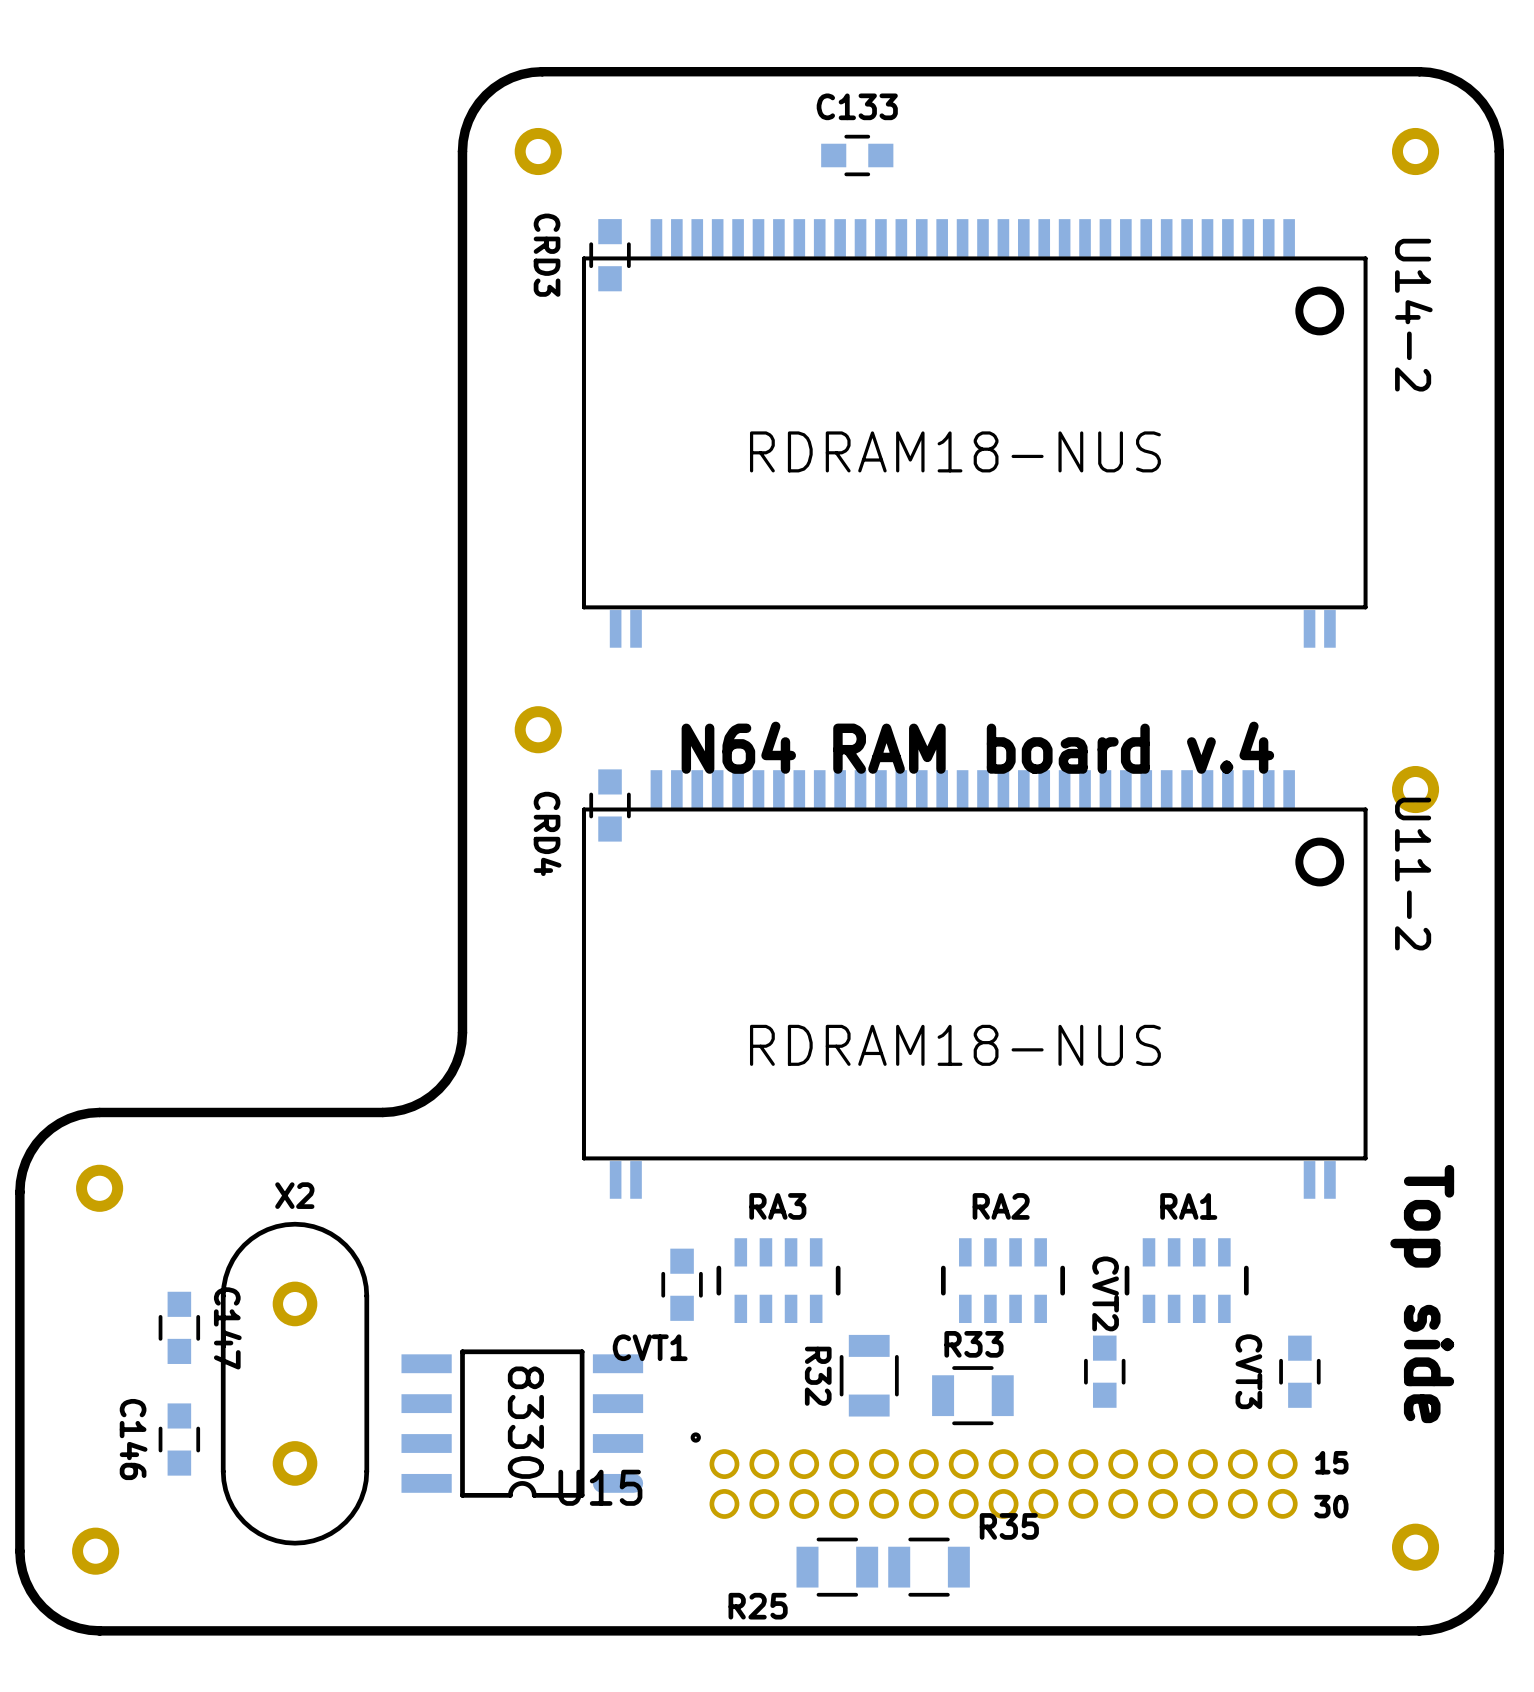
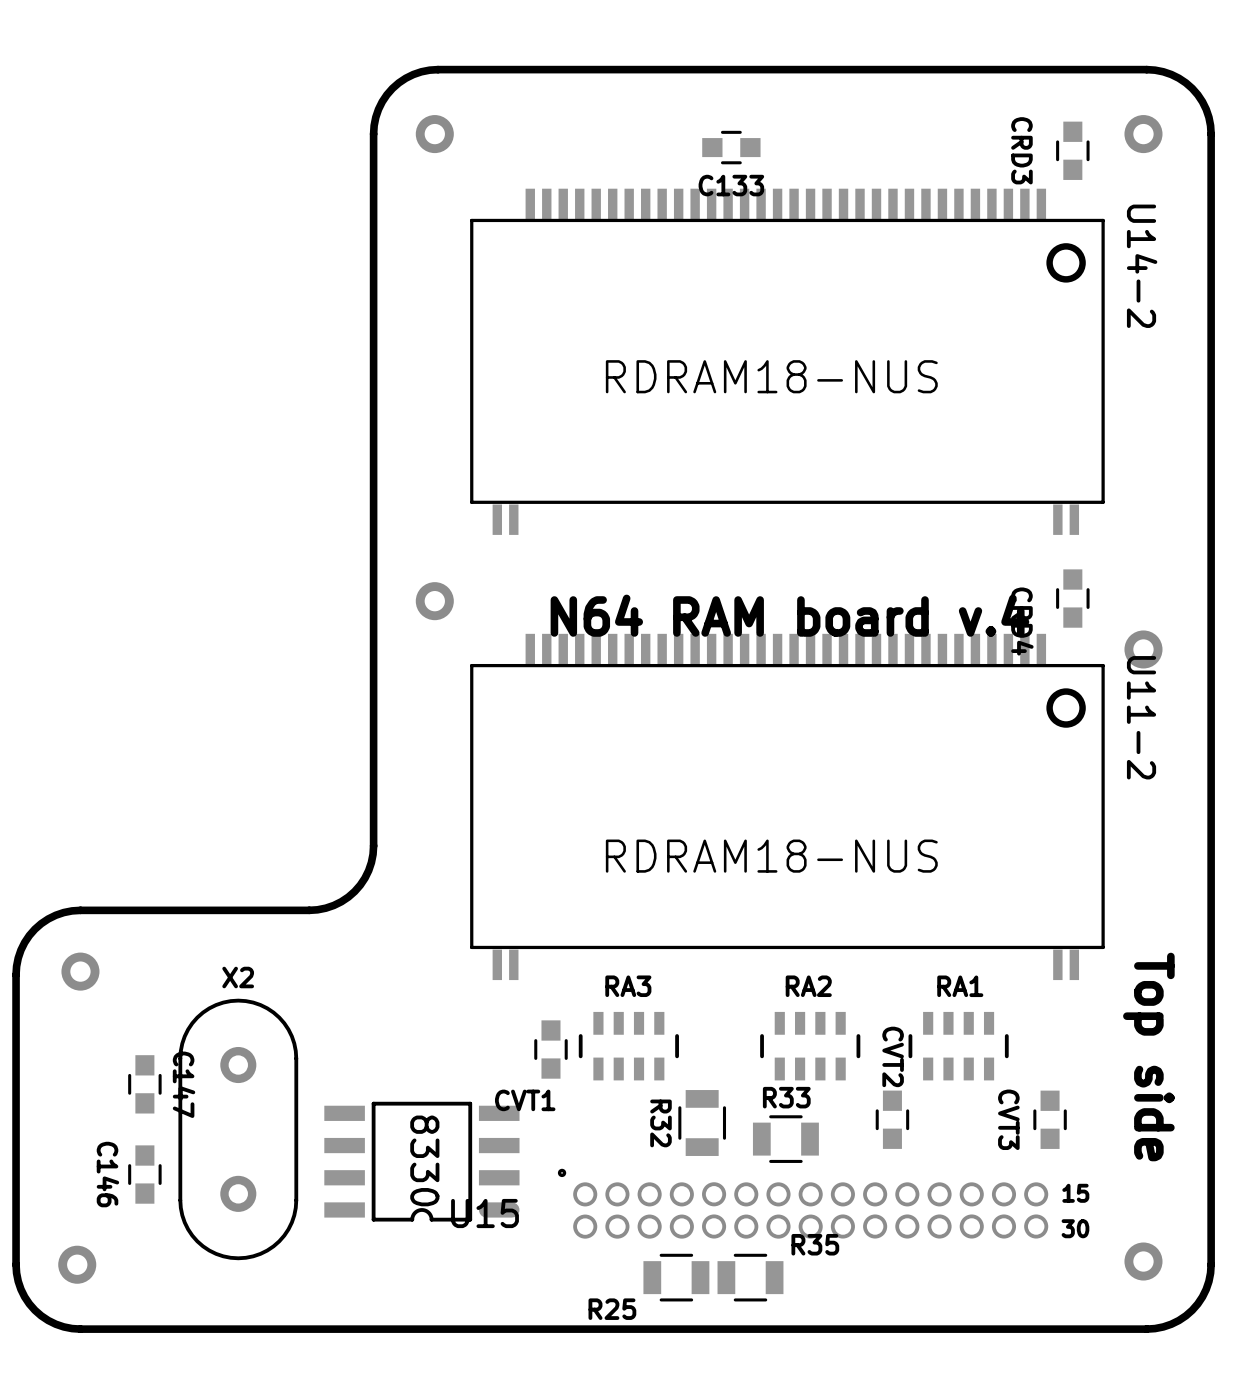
C133 name position: C133 (857, 106) -> C133 (731, 185)
C133 position: (857, 155) -> (731, 147)
CRD3 position: (610, 255) -> (1072, 150)
CRD4 position: (610, 805) -> (1072, 598)

